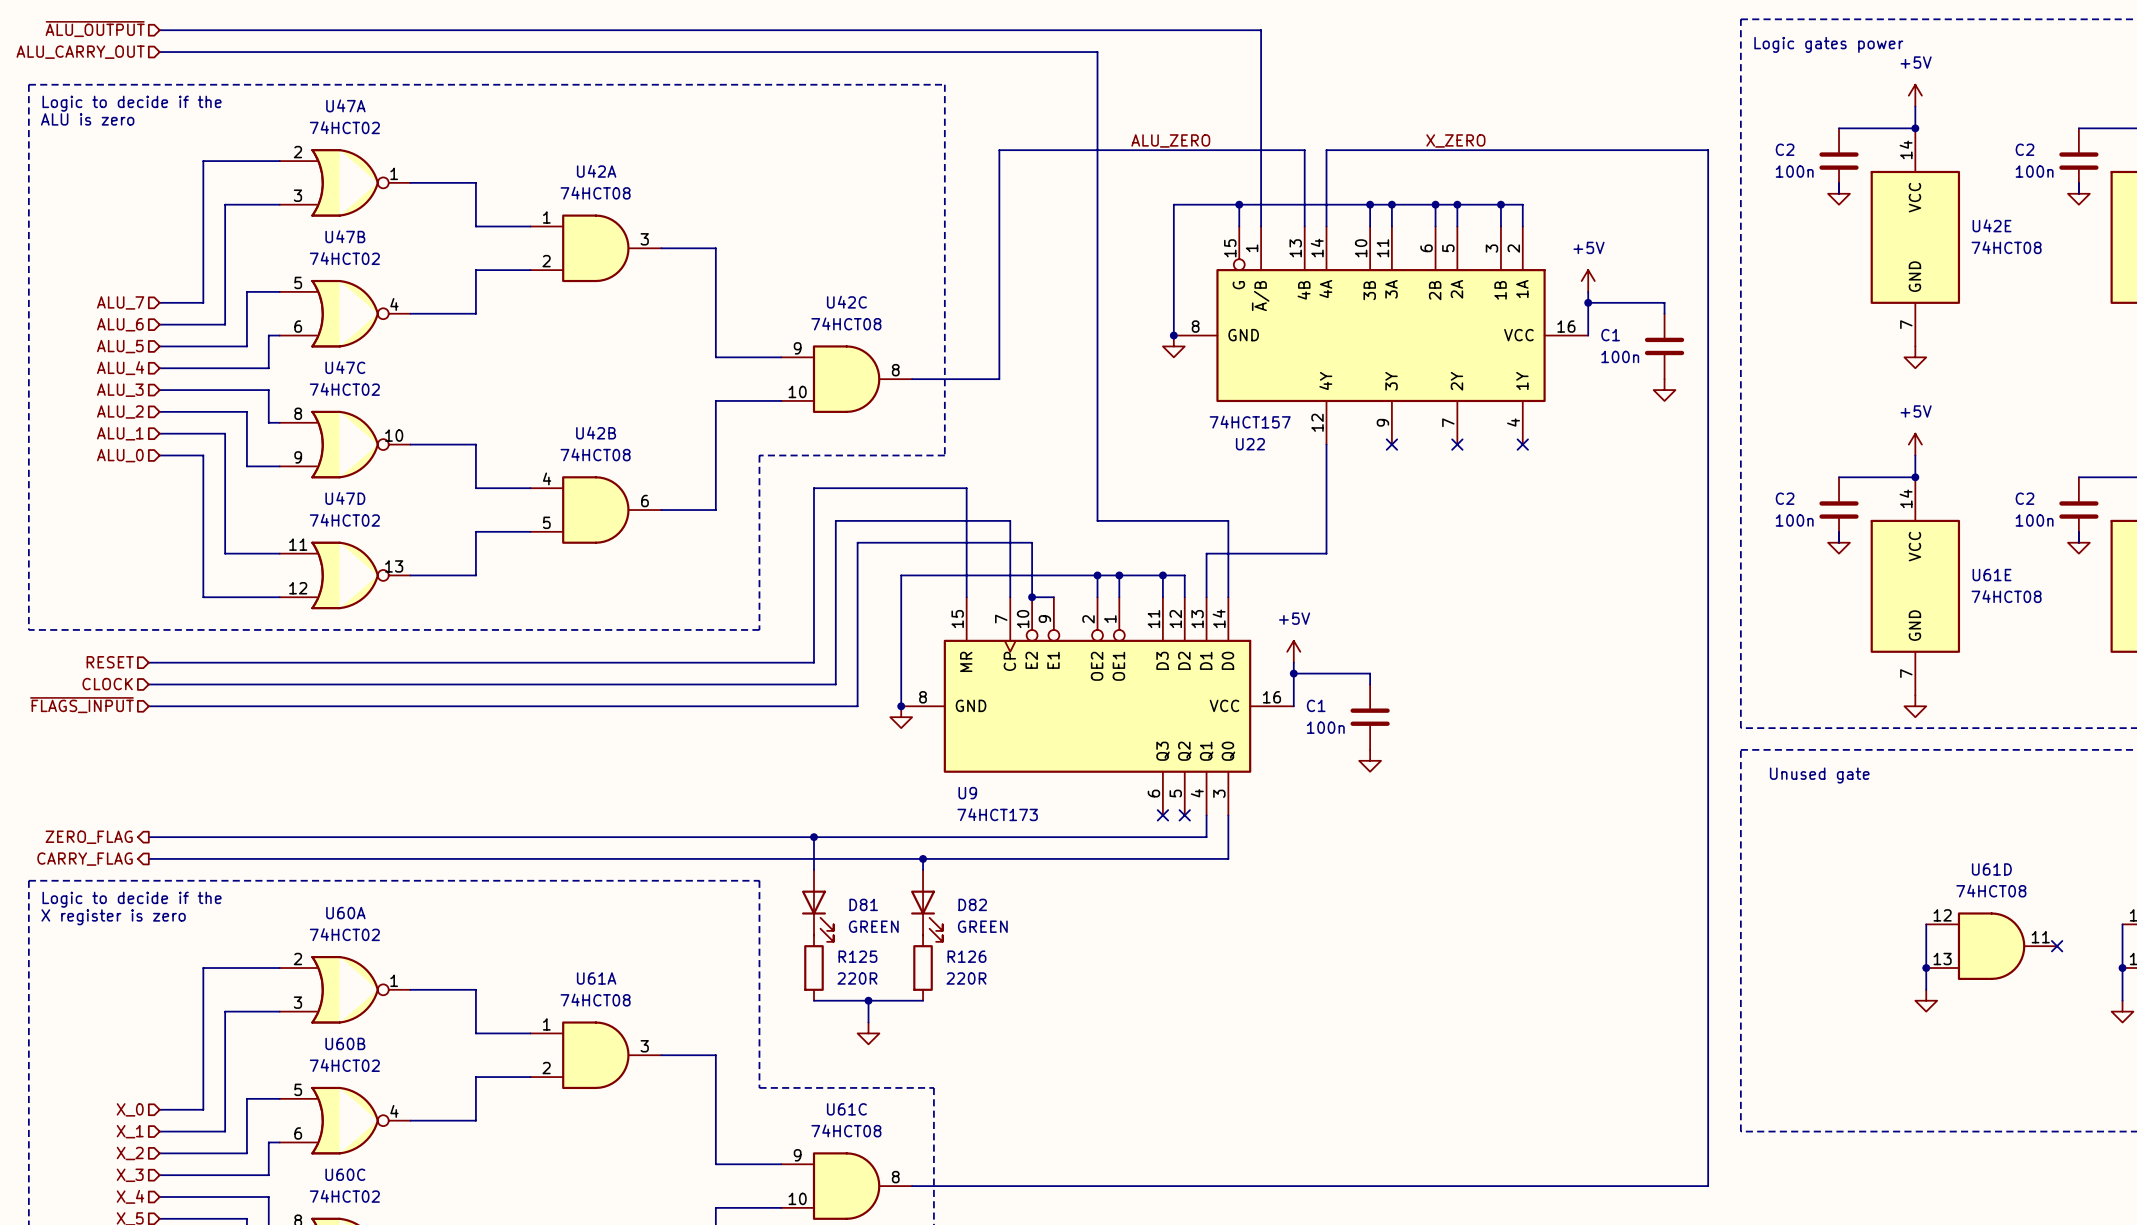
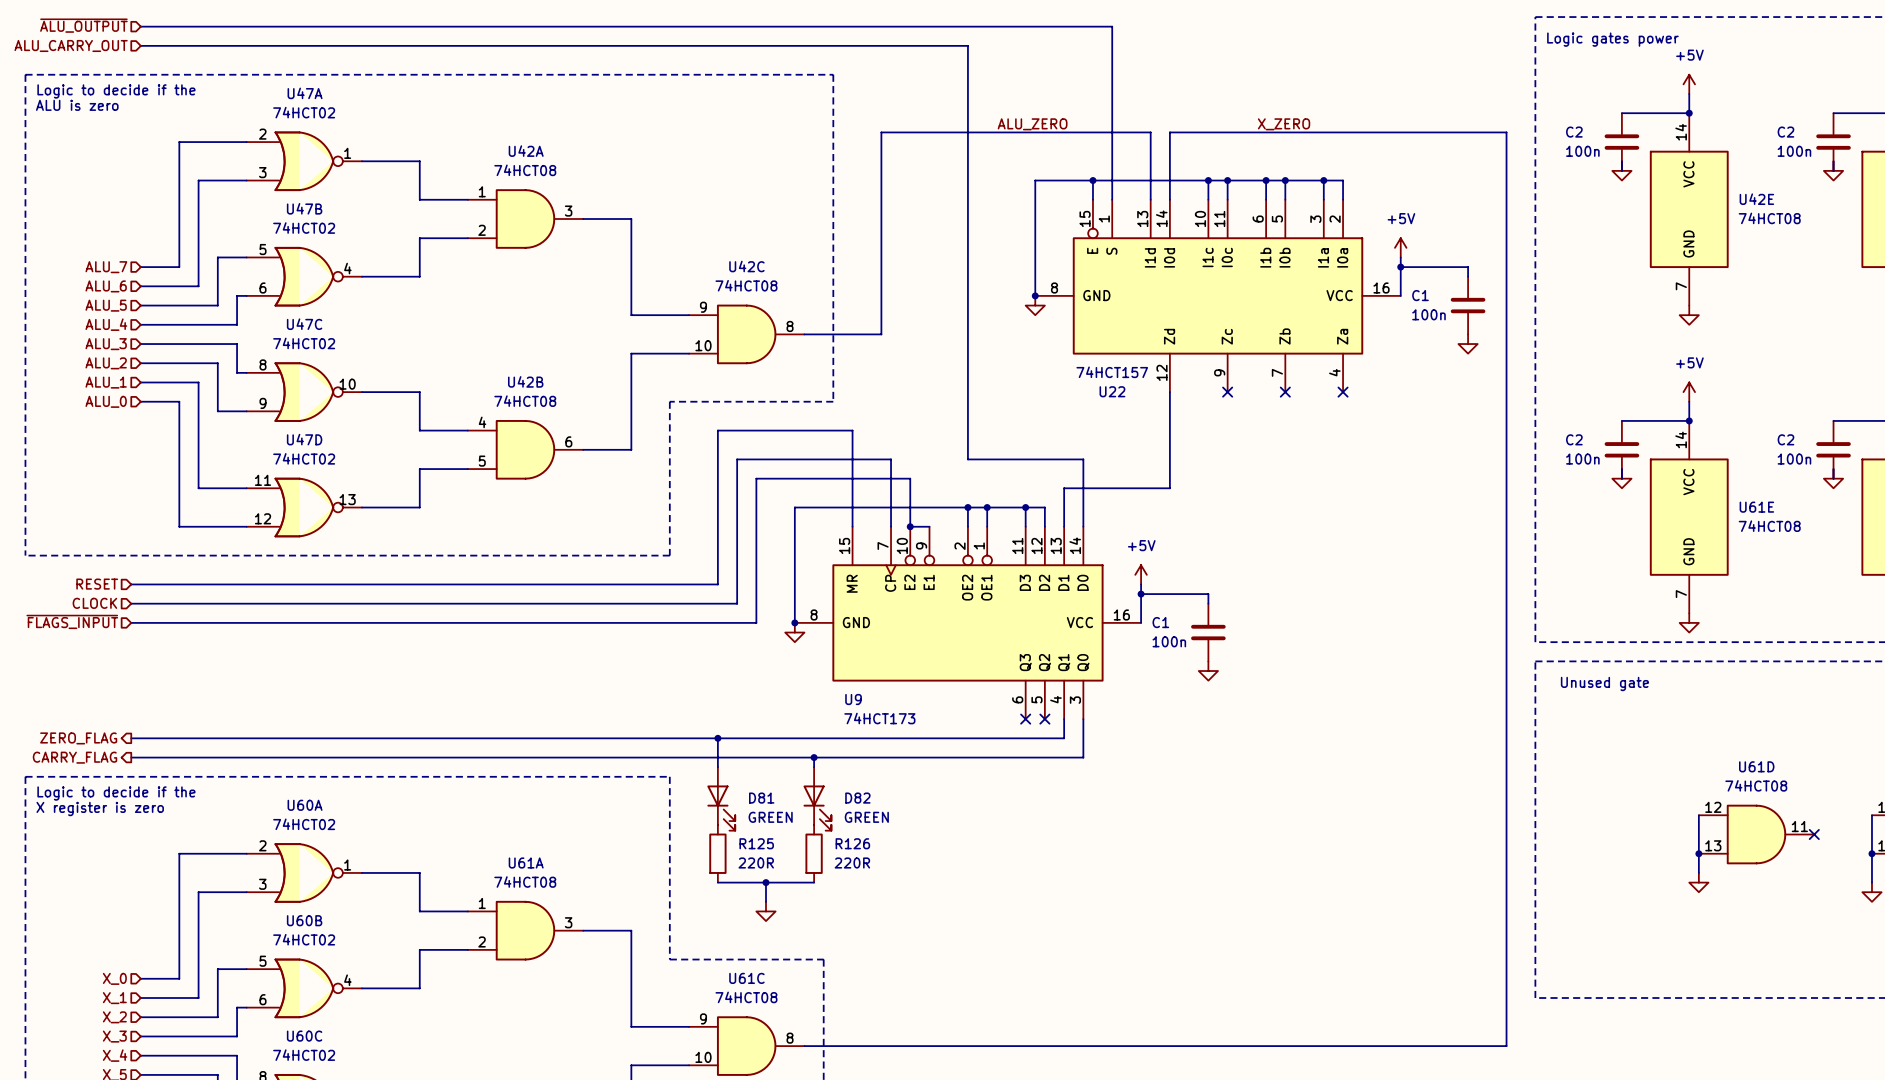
U22 symbol: [1173, 226, 1589, 445] -> [1035, 199, 1401, 393]

